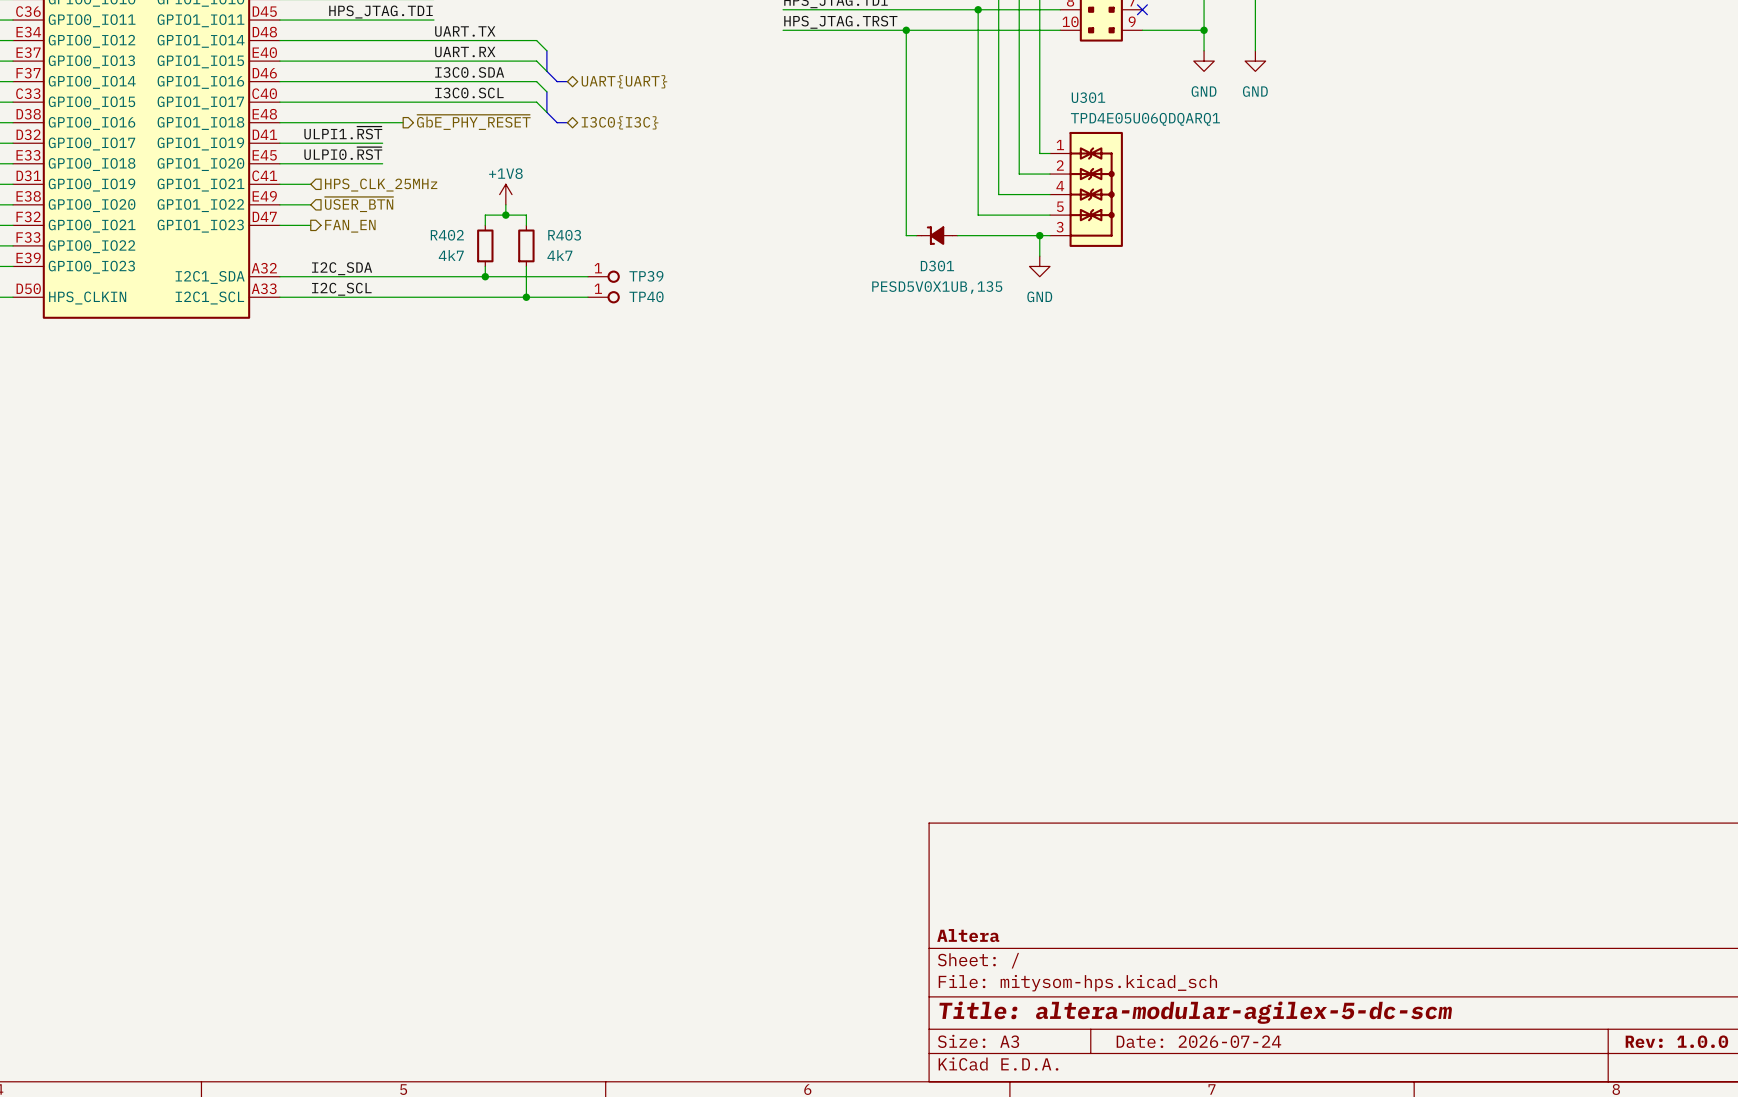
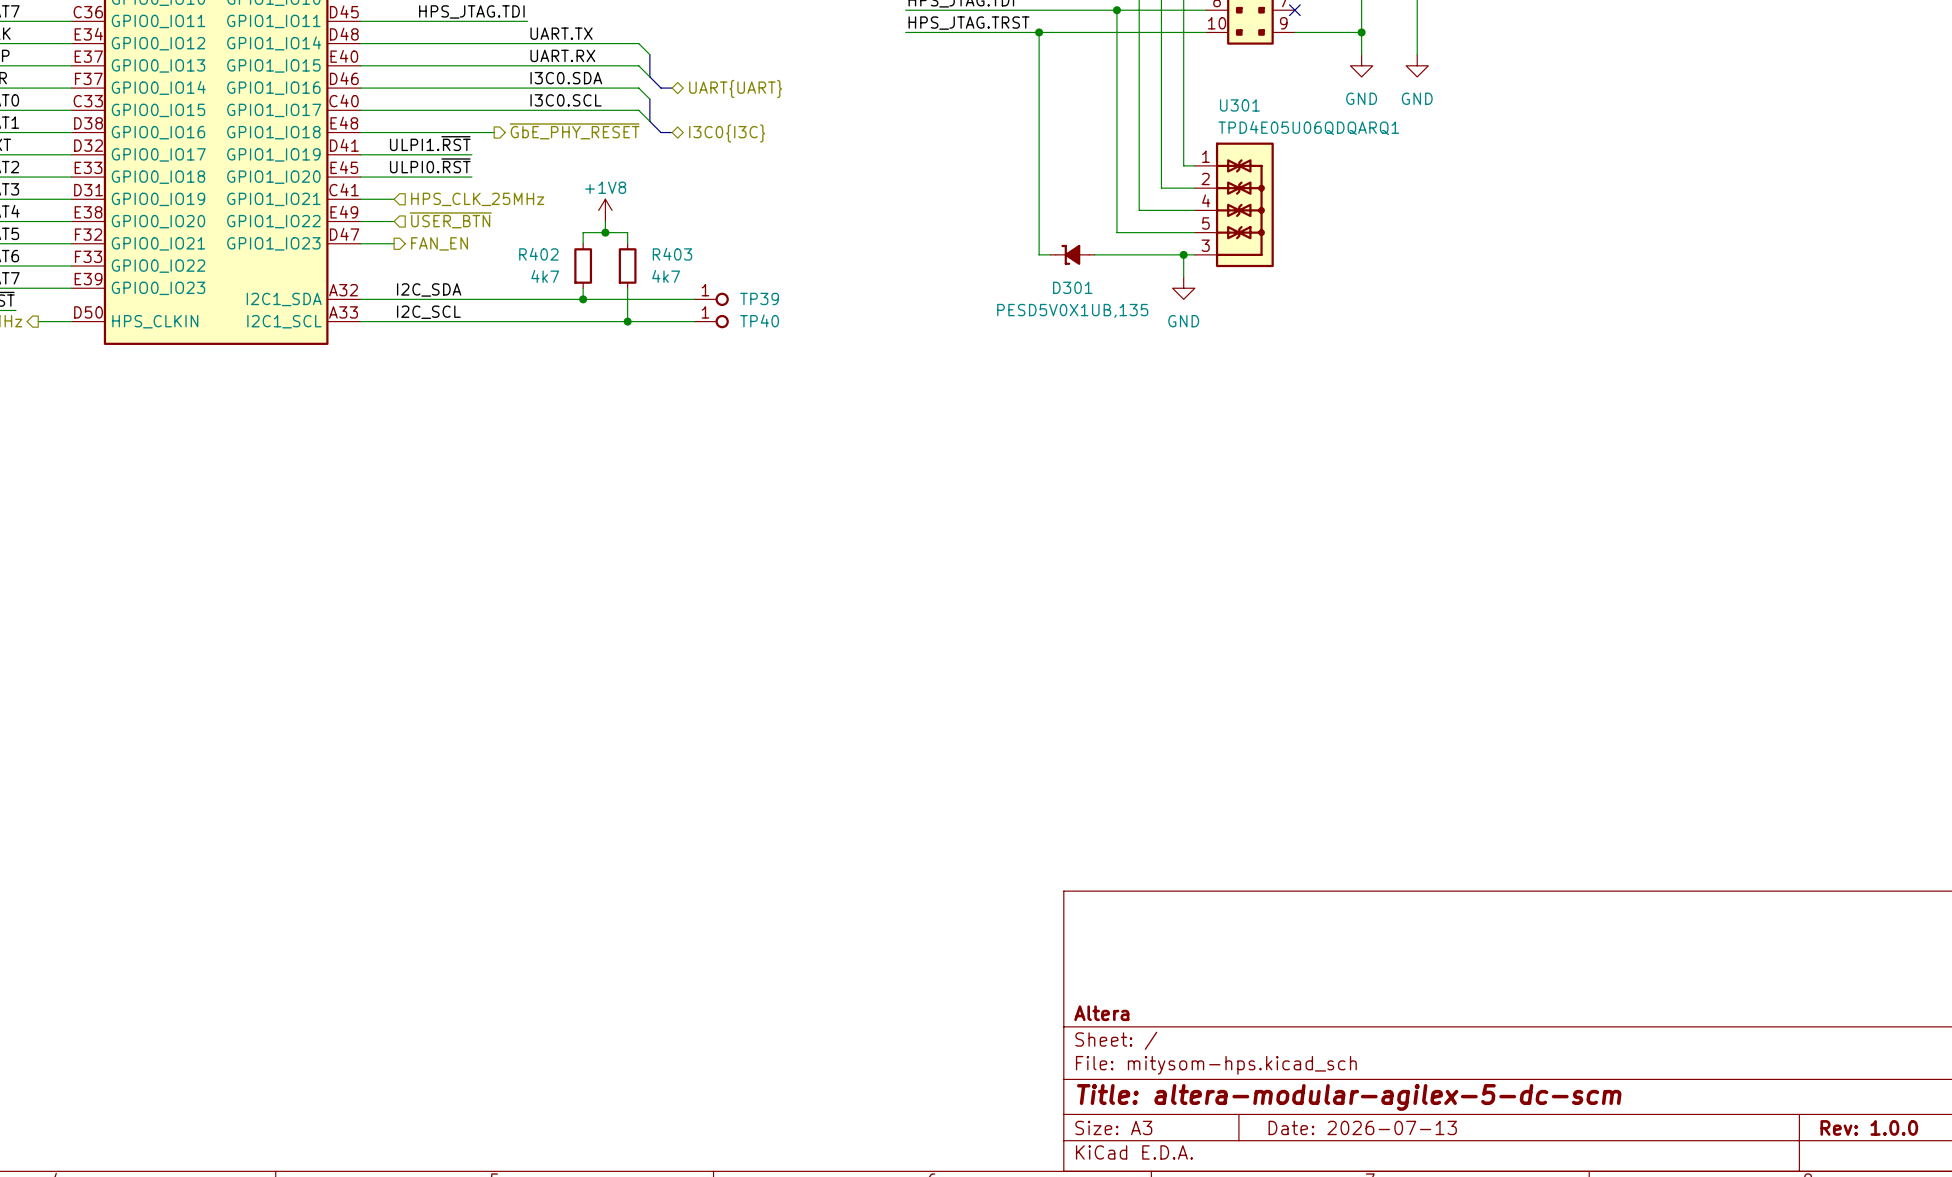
title block: Date: 2026-07-24 (1198, 1041) -> Date: 2026-07-13 (1362, 1127)

